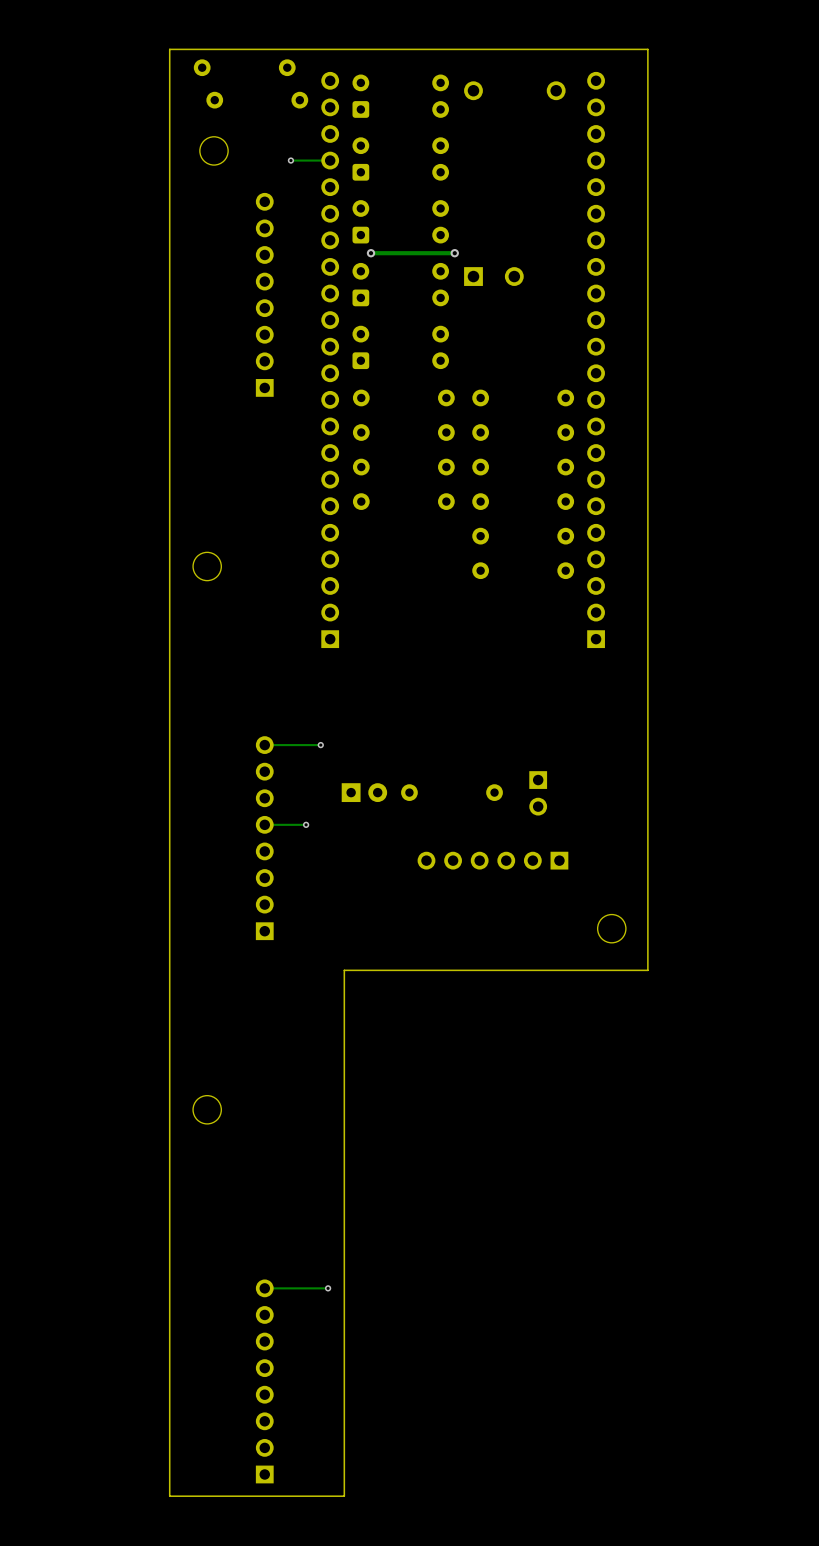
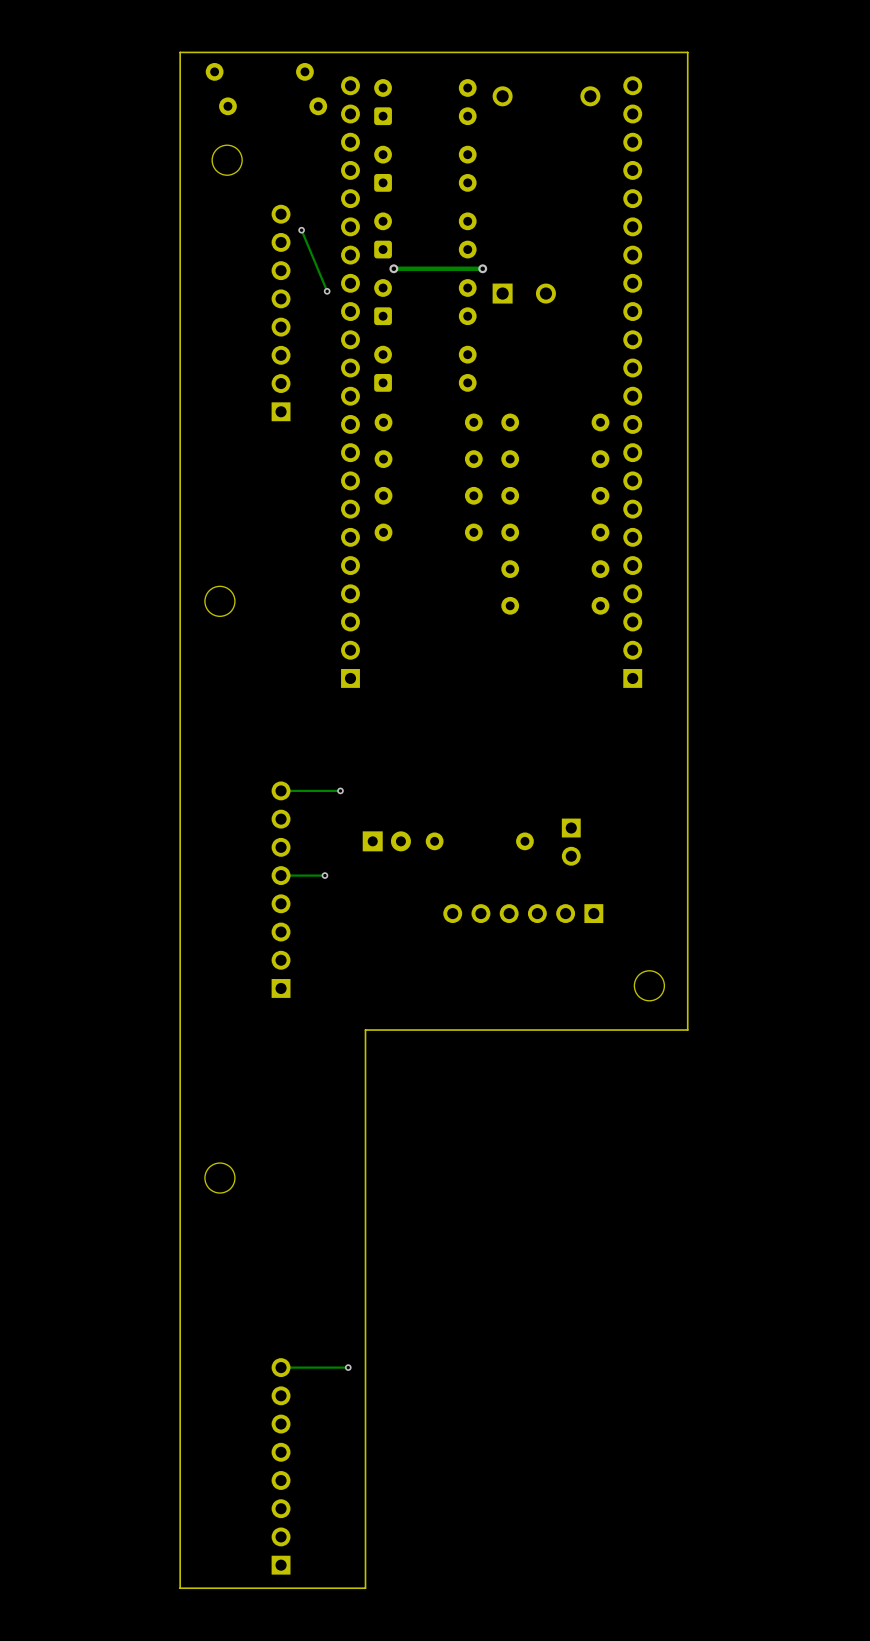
via position: (290, 160) -> (301, 230)
track: (330, 160) (290, 160) -> none
track: none -> (301, 230) (327, 291)
via: none -> (327, 291)

